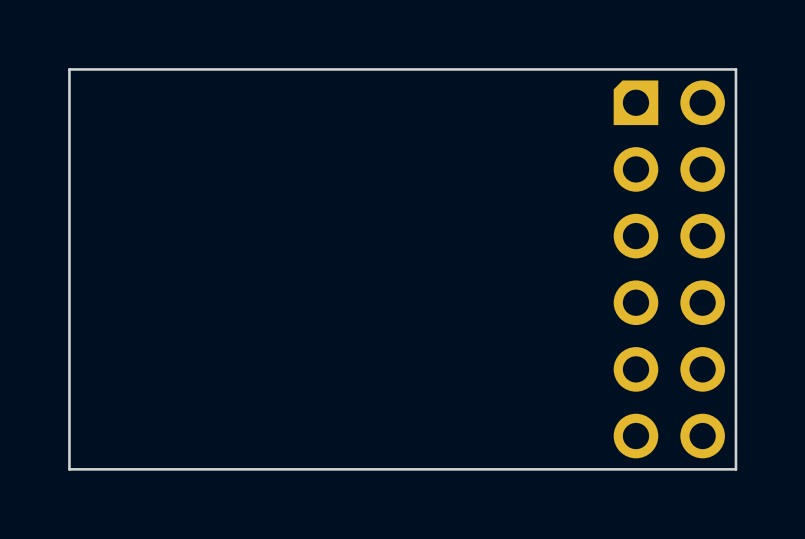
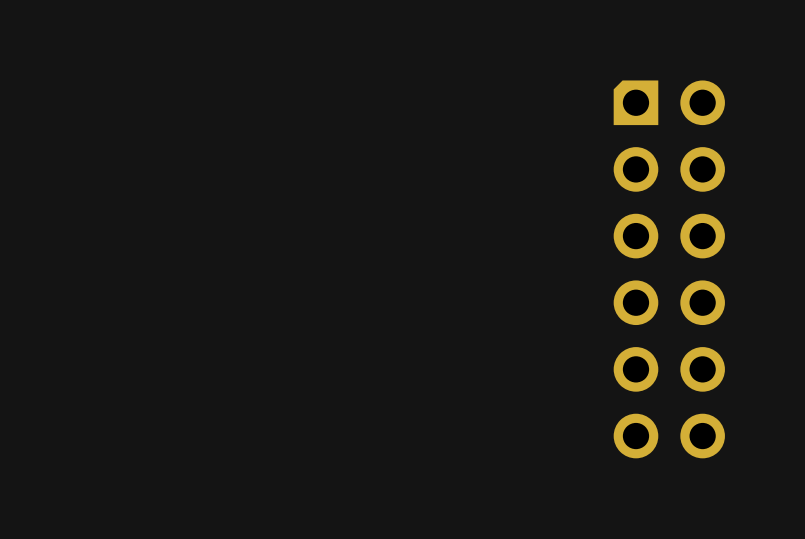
board edge: (735, 69) (69, 69) (69, 469) (735, 469) (735, 69) -> none

